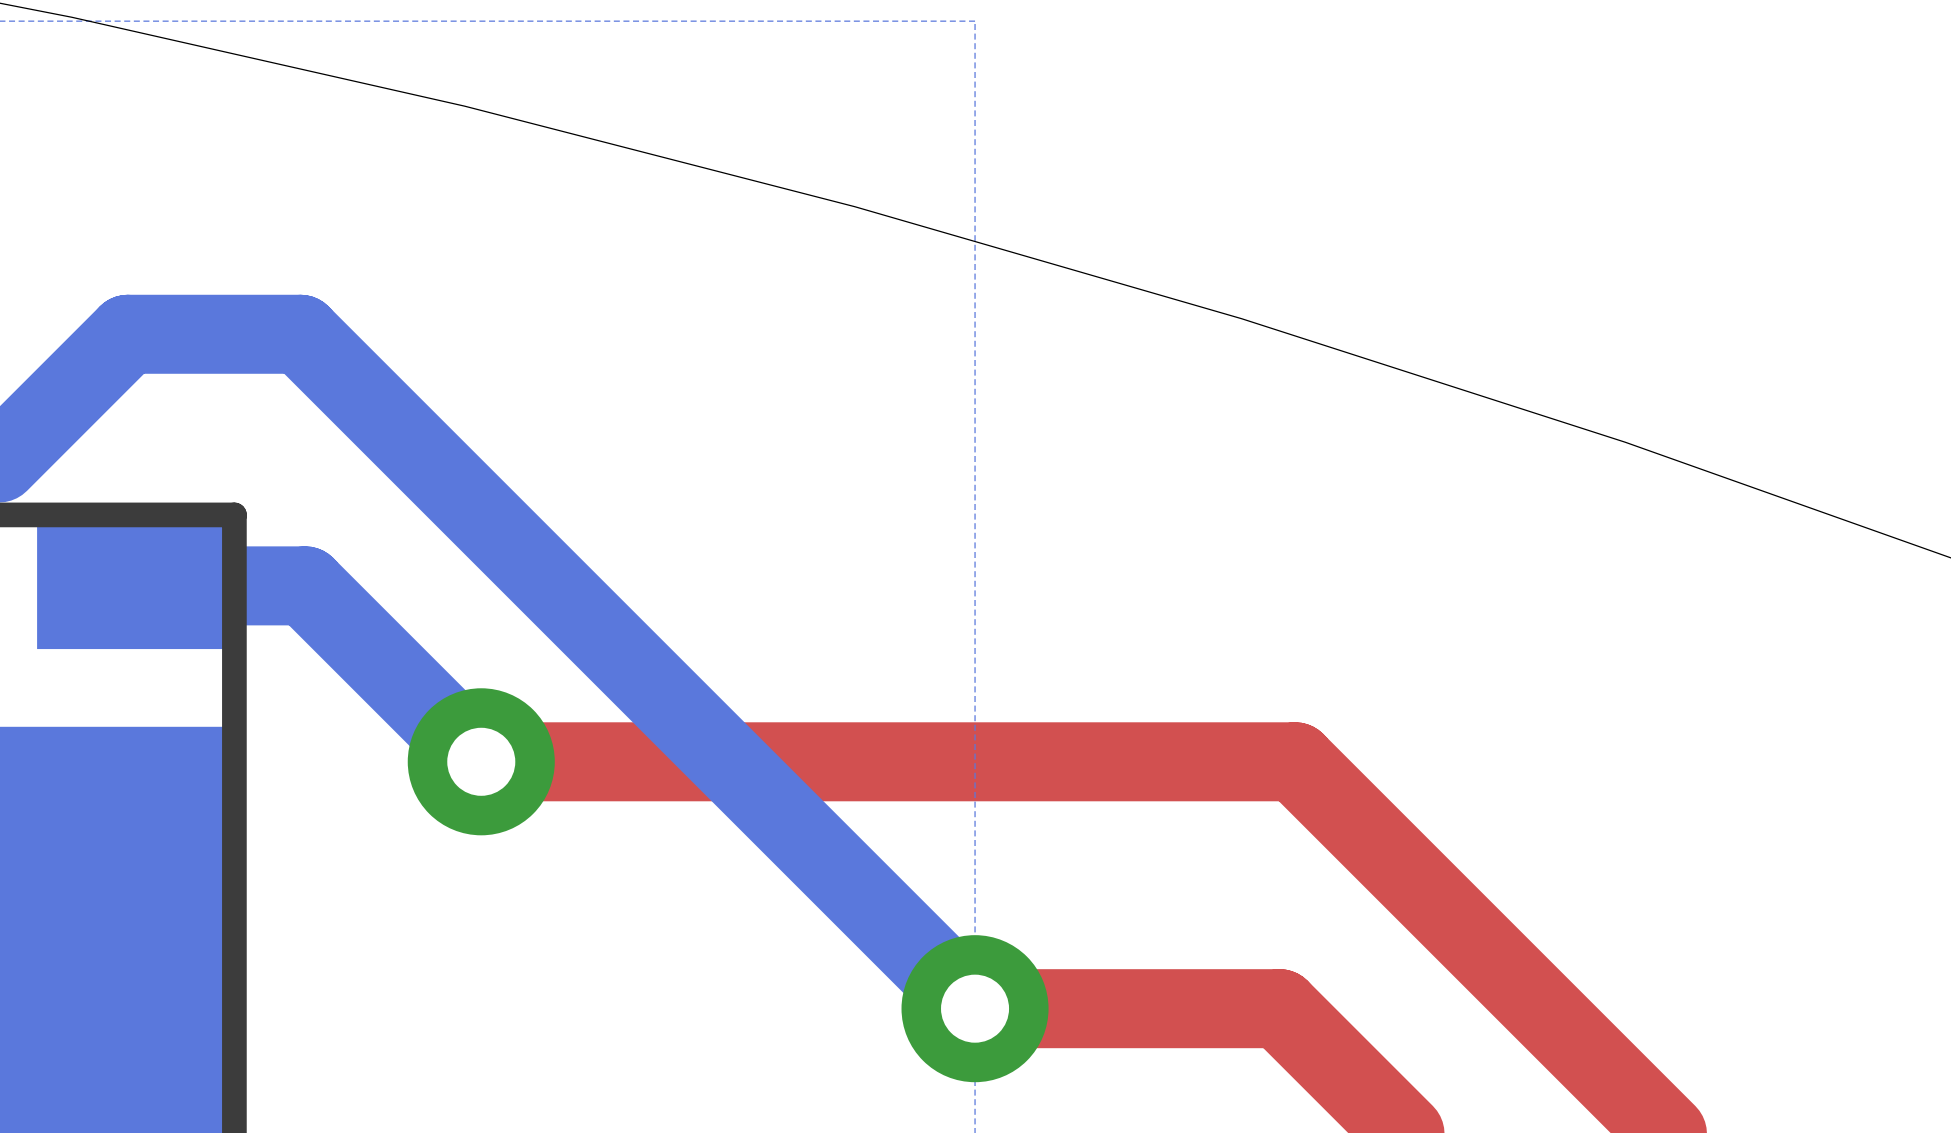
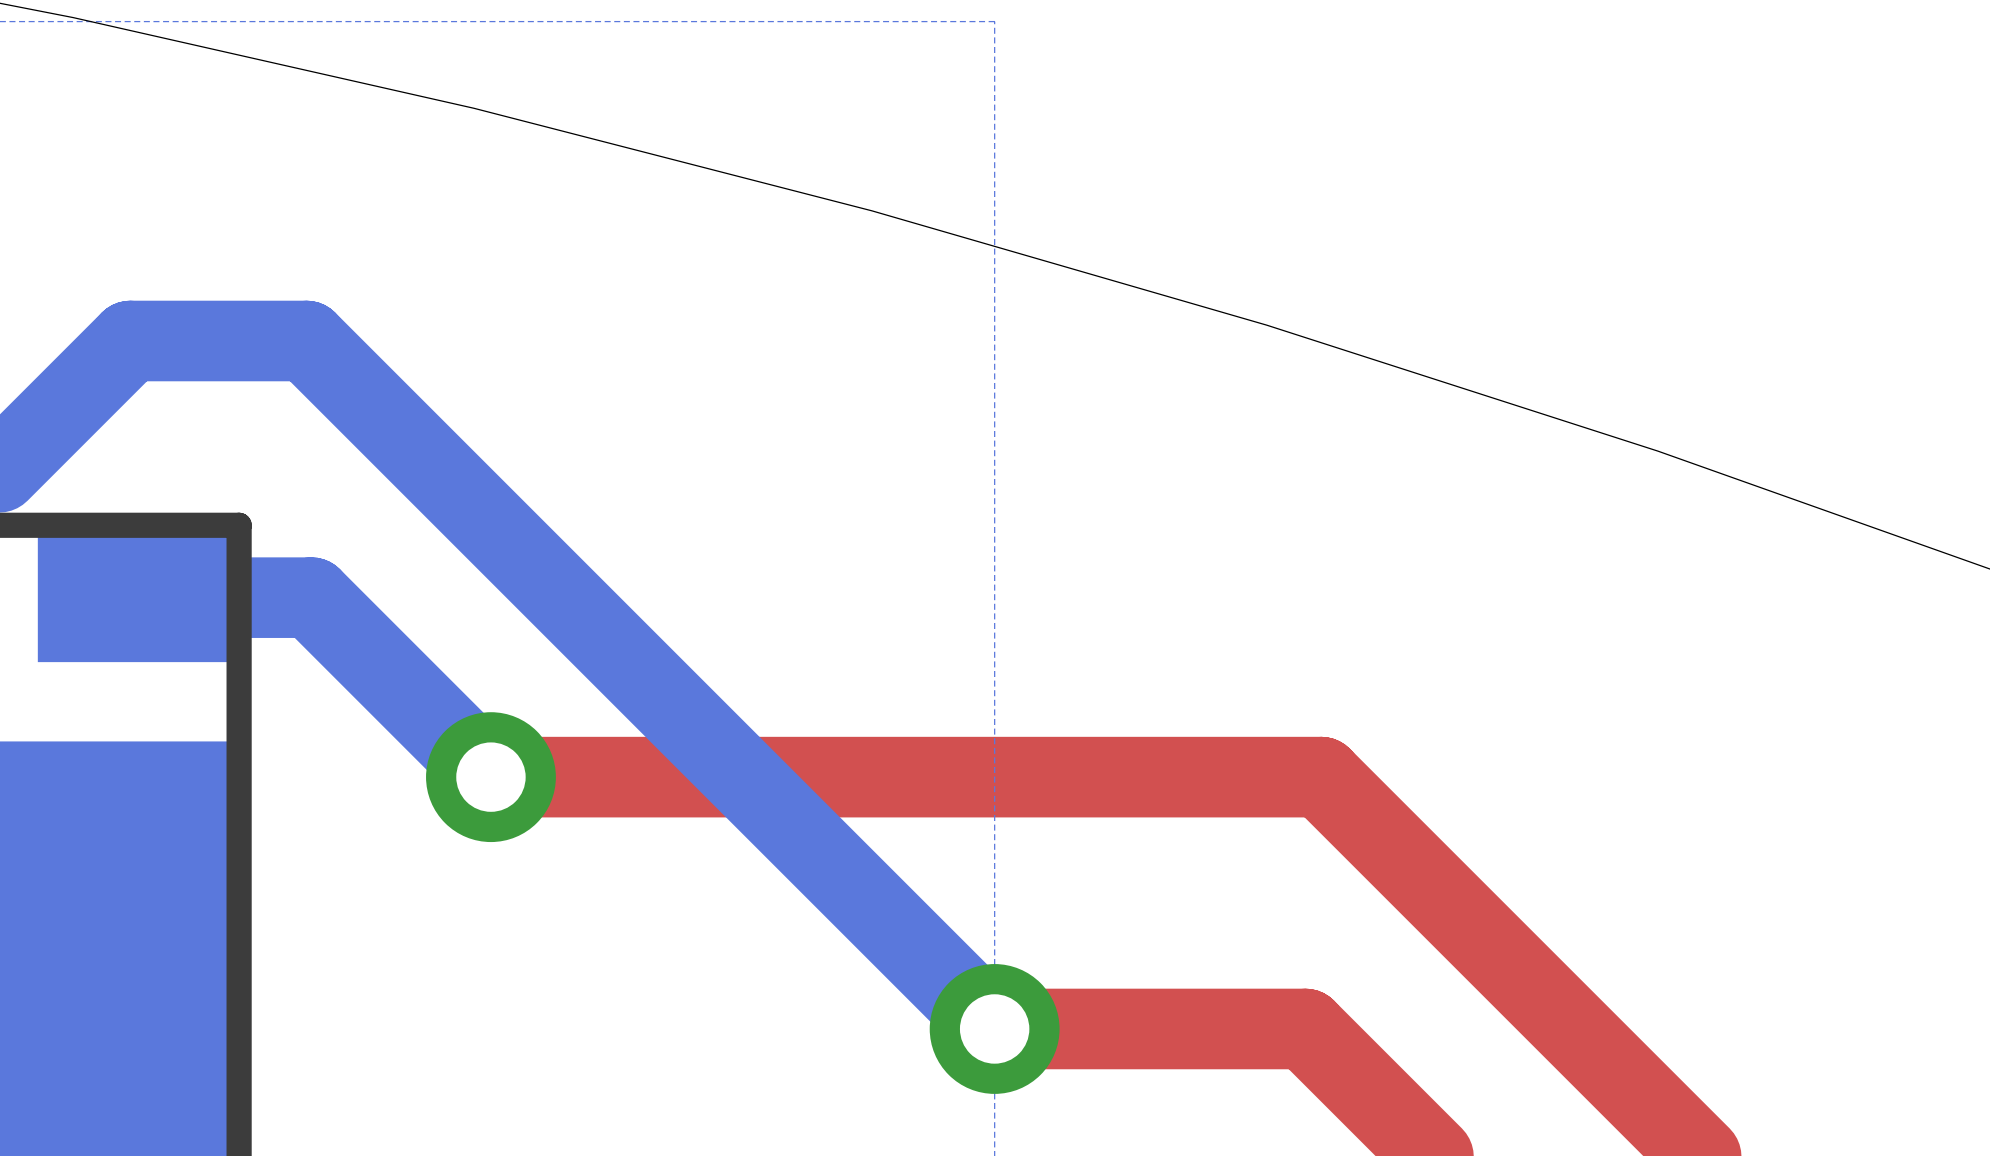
via size: [407, 688, 555, 836] -> [426, 712, 556, 843]
via size: [901, 935, 1049, 1083] -> [929, 964, 1060, 1094]

